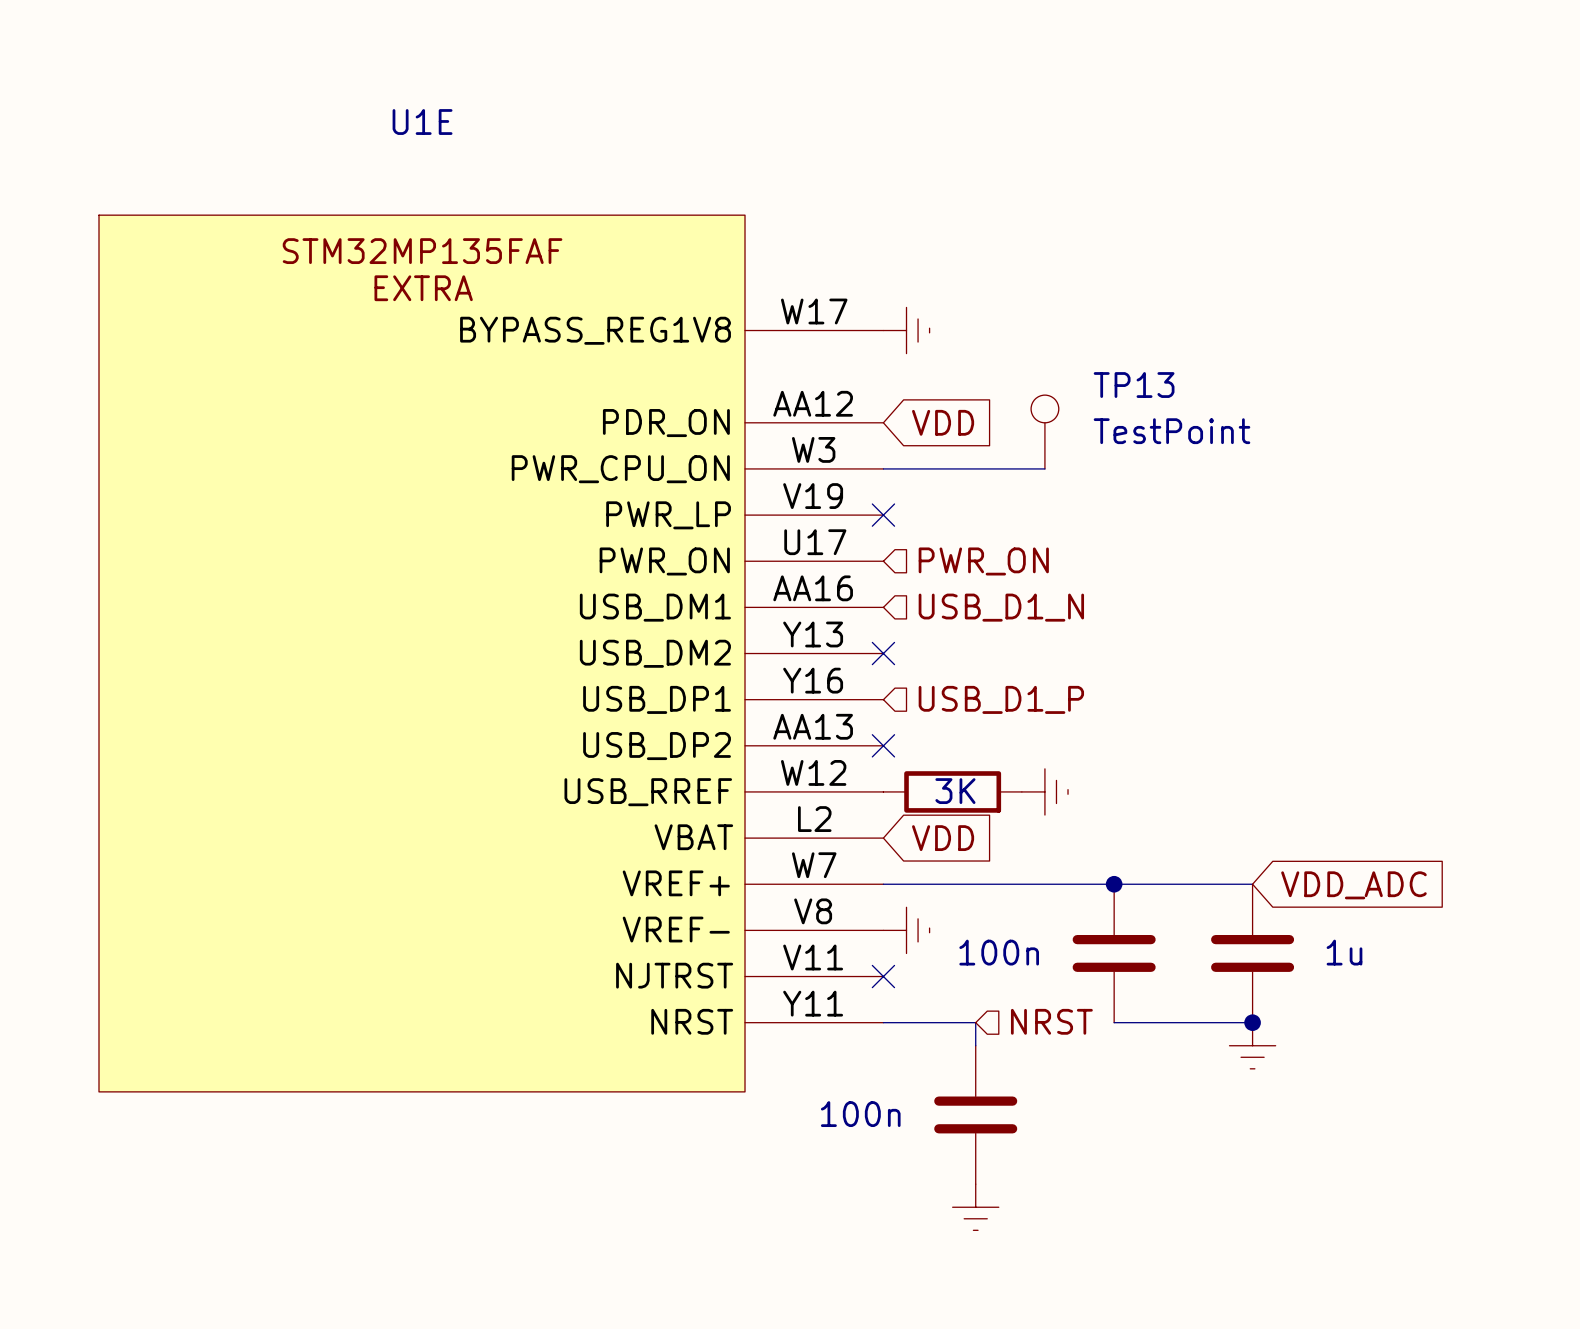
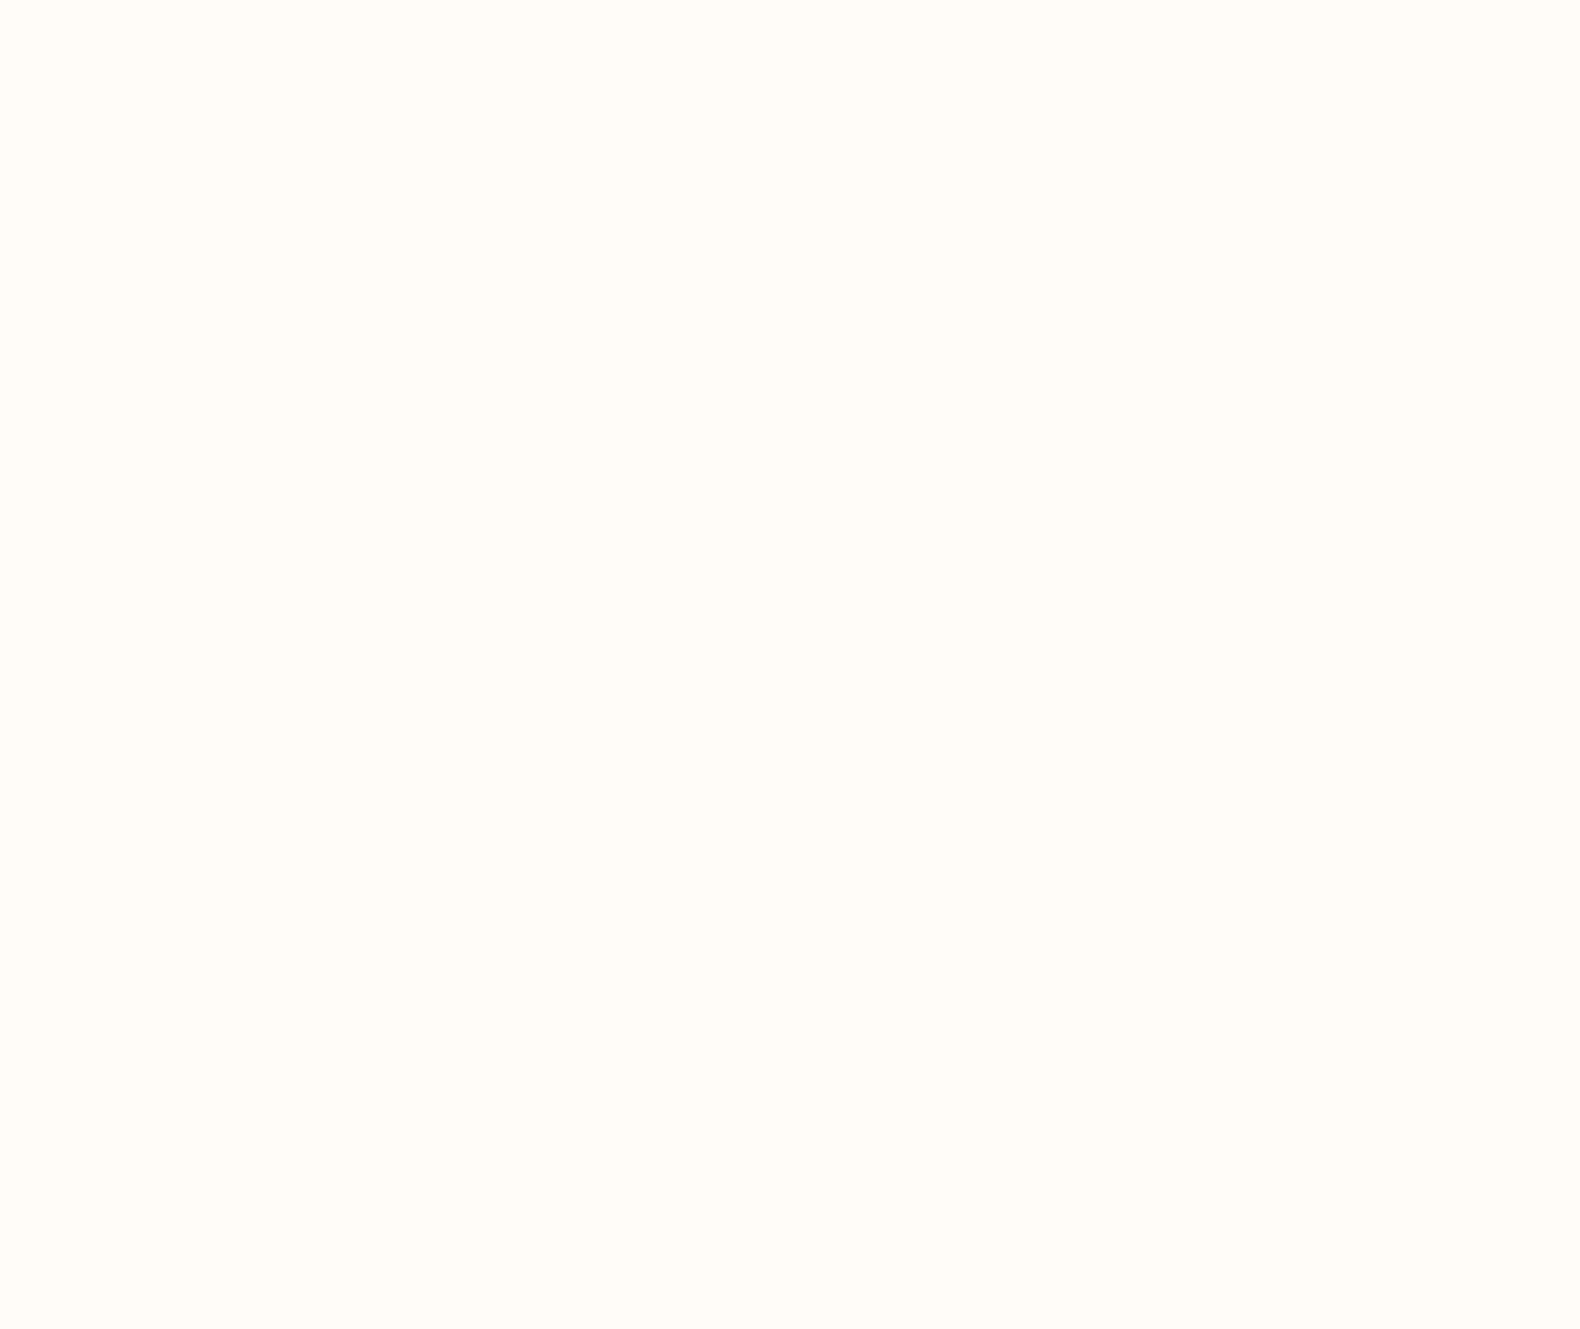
power symbol: (906, 330) -> none
global label: VDD (943, 422) -> none
TP13: TestPoint (1044, 432) -> none
wire: (883, 468) (1044, 468) -> none
no-connect mark: (883, 515) -> none
hierarchical label: PWR_ON (983, 561) -> none
hierarchical label: USB_D1_N (1001, 607) -> none
U1E: (491, 653) -> none
no-connect mark: (883, 653) -> none
hierarchical label: USB_D1_P (1001, 699) -> none
no-connect mark: (883, 745) -> none
part: 3K (952, 791) -> none
power symbol: (1044, 791) -> none
global label: VDD (943, 838) -> none
wire: (883, 884) (1252, 884) -> none
junction: (1114, 884) -> none
global label: VDD_ADC (1353, 885) -> none
power symbol: (906, 930) -> none
part: 100n (1114, 953) -> none
part: 1u (1252, 953) -> none
no-connect mark: (883, 976) -> none
hierarchical label: NRST (1051, 1021) -> none
wire: (883, 1022) (975, 1022) (975, 1045) -> none
wire: (1114, 1022) (1252, 1022) -> none
junction: (1252, 1022) -> none
power symbol: (1252, 1045) -> none
part: 100n (975, 1114) -> none
power symbol: (975, 1207) -> none

